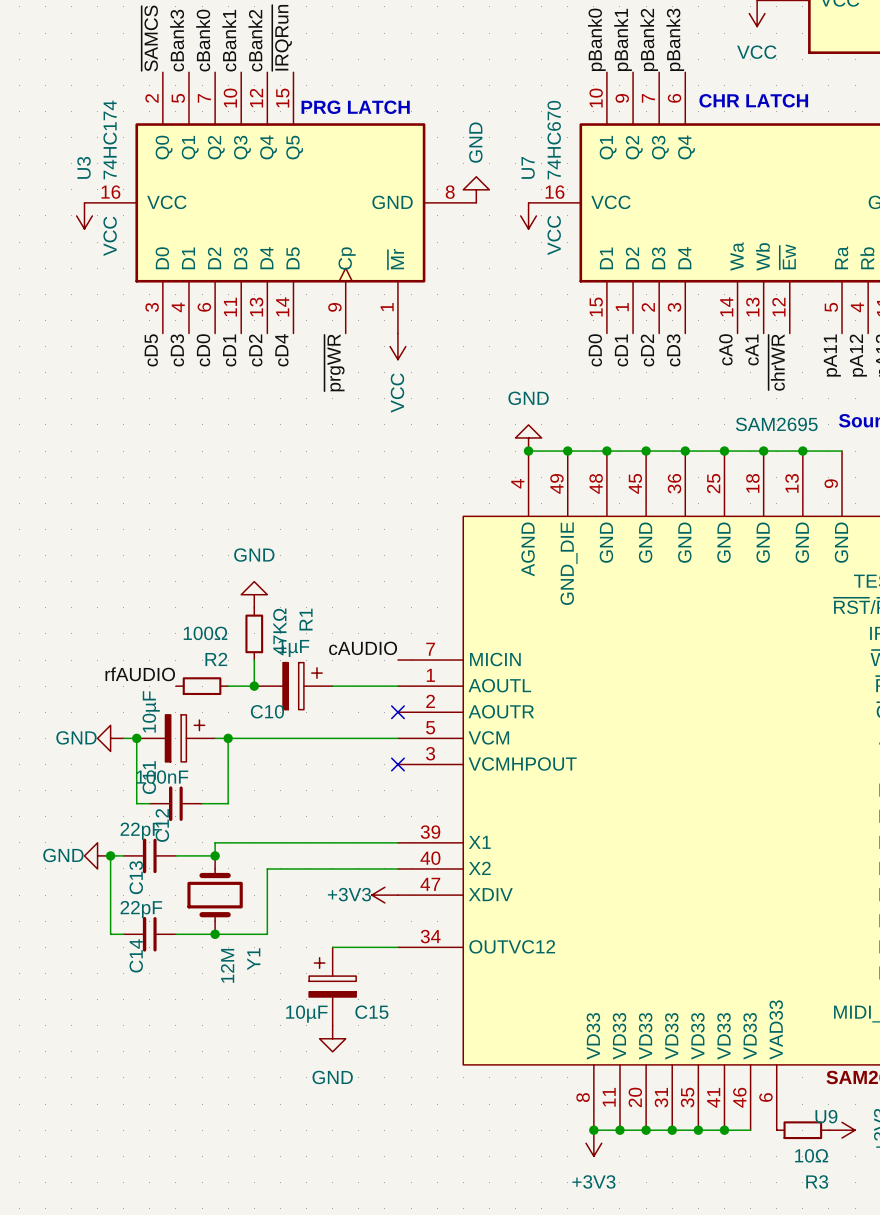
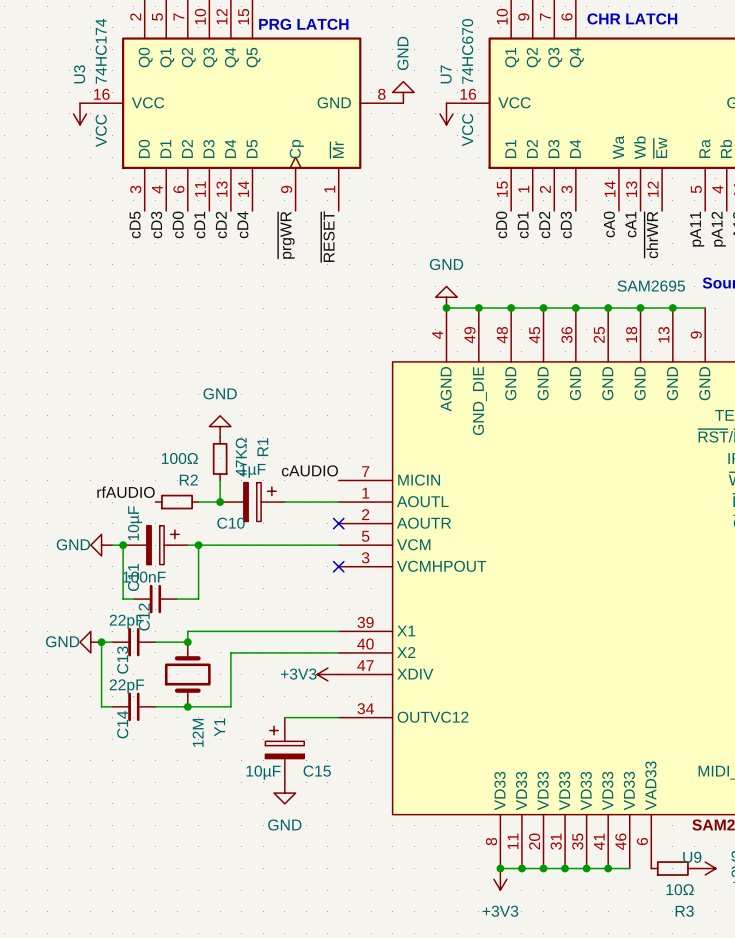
power symbol: VCC (397, 346) -> none
label: none -> ~{RESET} (327, 236)

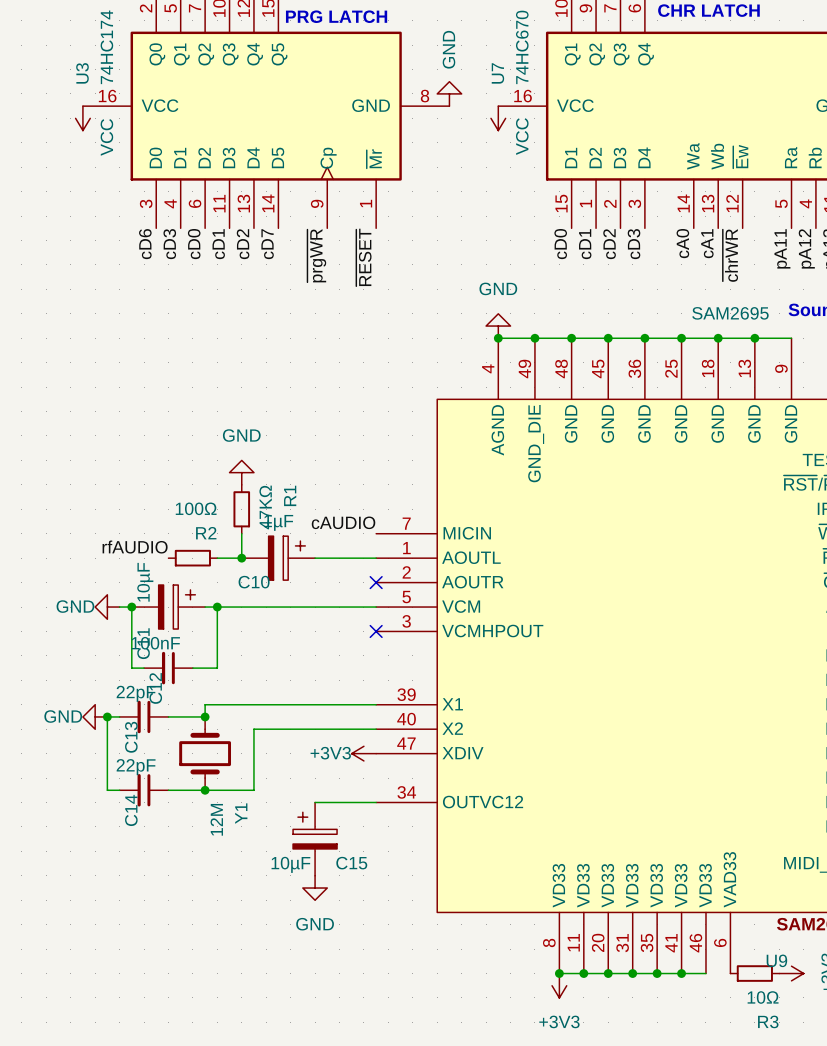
label: cD5 (135, 224) -> cD6 (145, 244)
label: cD4 (242, 224) -> cD7 (267, 244)

